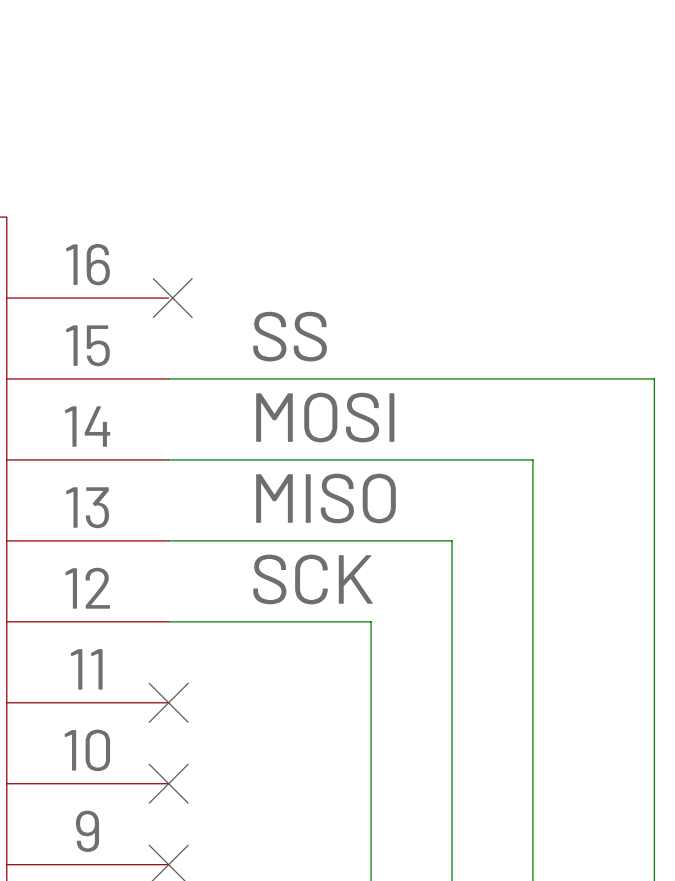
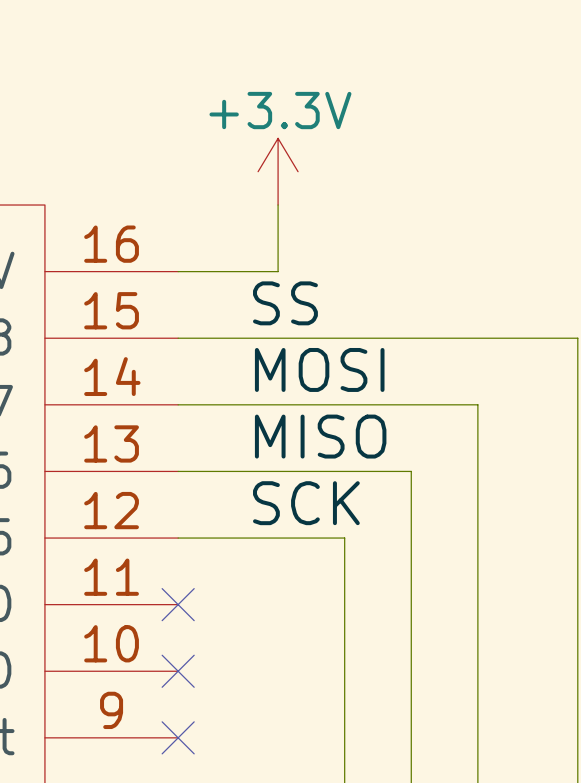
power symbol: none -> +3.3V (278, 171)
wire: none -> (278, 205) (278, 271) (178, 271)
no-connect mark: (172, 298) -> none

